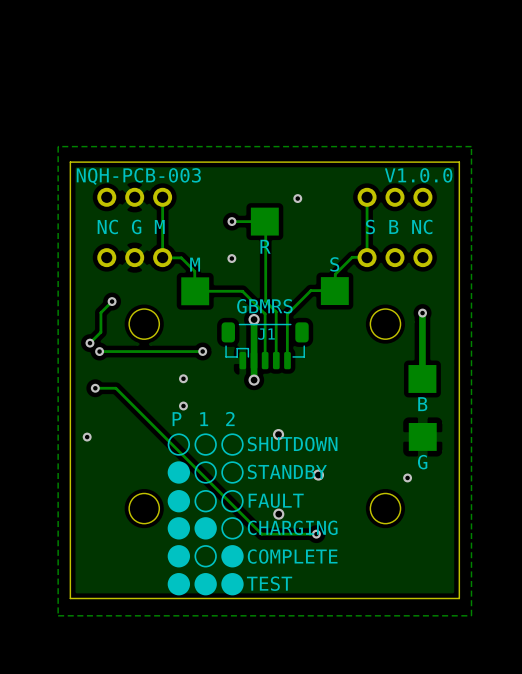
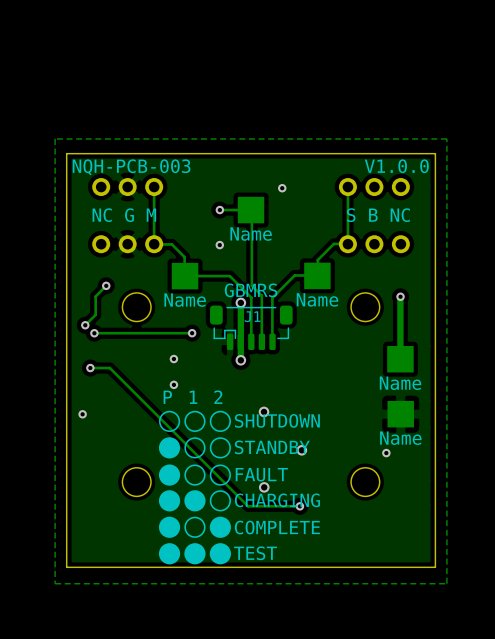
part text: R (265, 246) -> Name (251, 234)
part text: M (195, 264) -> none
part text: S (334, 264) -> none
part text: none -> Name (185, 300)
part text: none -> Name (317, 299)
part text: B (422, 404) -> Name (400, 383)
part text: G (422, 462) -> Name (400, 438)

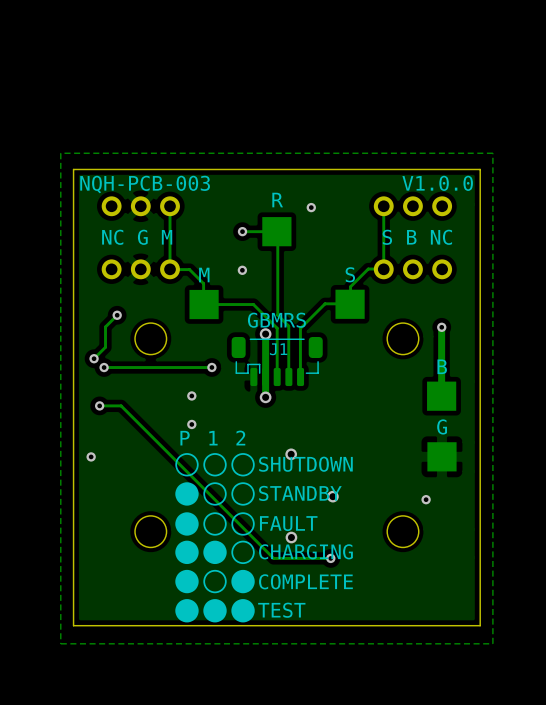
part text: none -> R (277, 200)
part text: Name (251, 234) -> none
part text: none -> M (204, 275)
part text: none -> S (350, 274)
part text: Name (317, 299) -> none
part text: Name (185, 300) -> none
part text: none -> B (442, 366)
part text: Name (400, 383) -> none
part text: none -> G (442, 426)
part text: Name (400, 438) -> none

